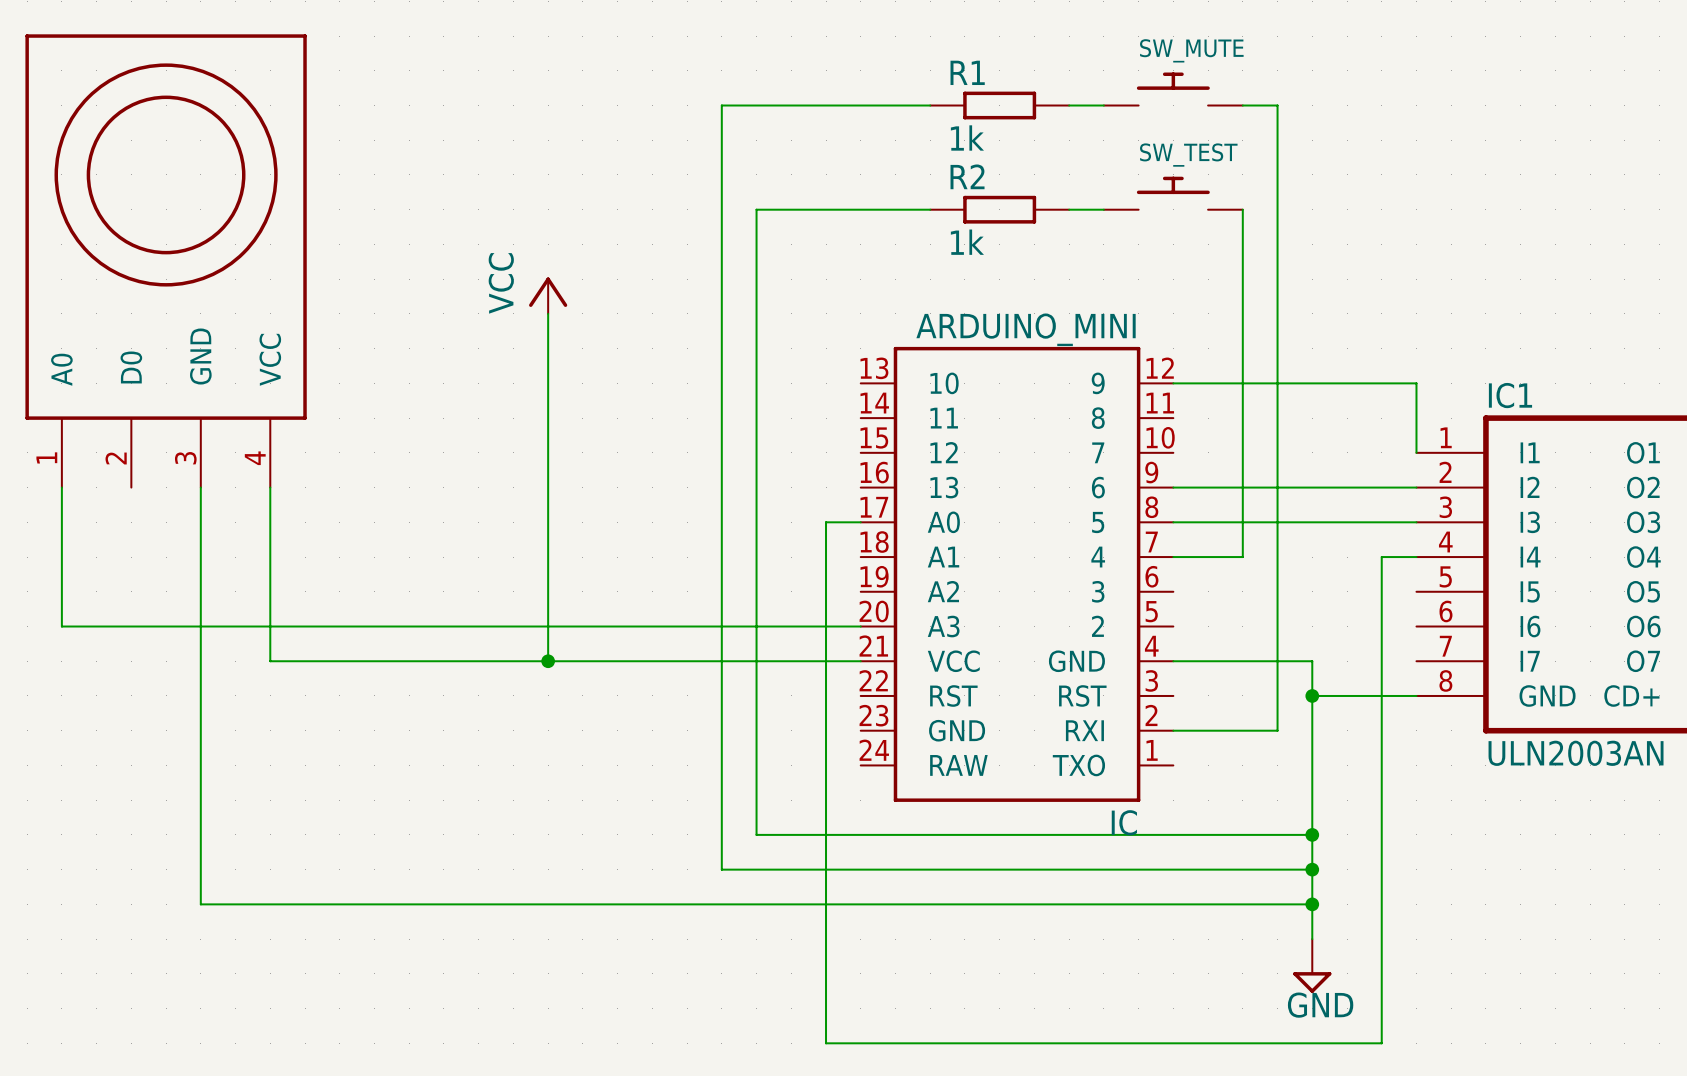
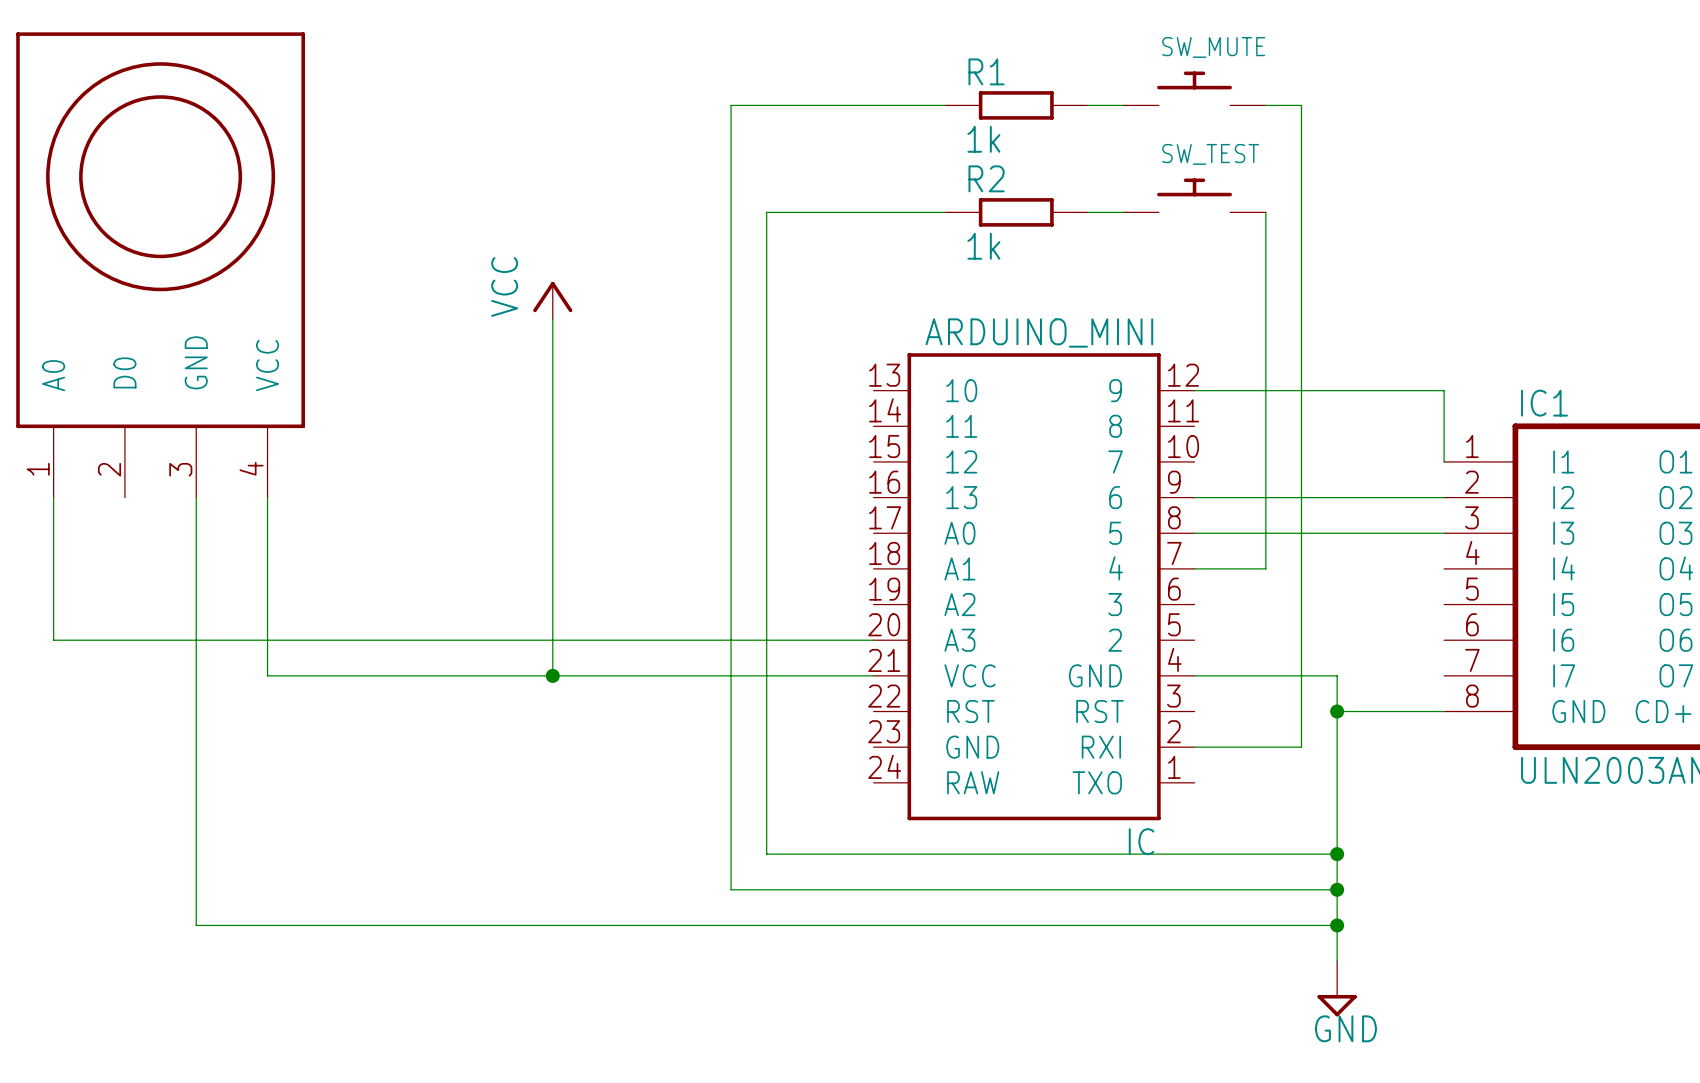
wire: (860, 522) (826, 522) (826, 1043) (1381, 1043) (1381, 557) (1416, 557) -> none

